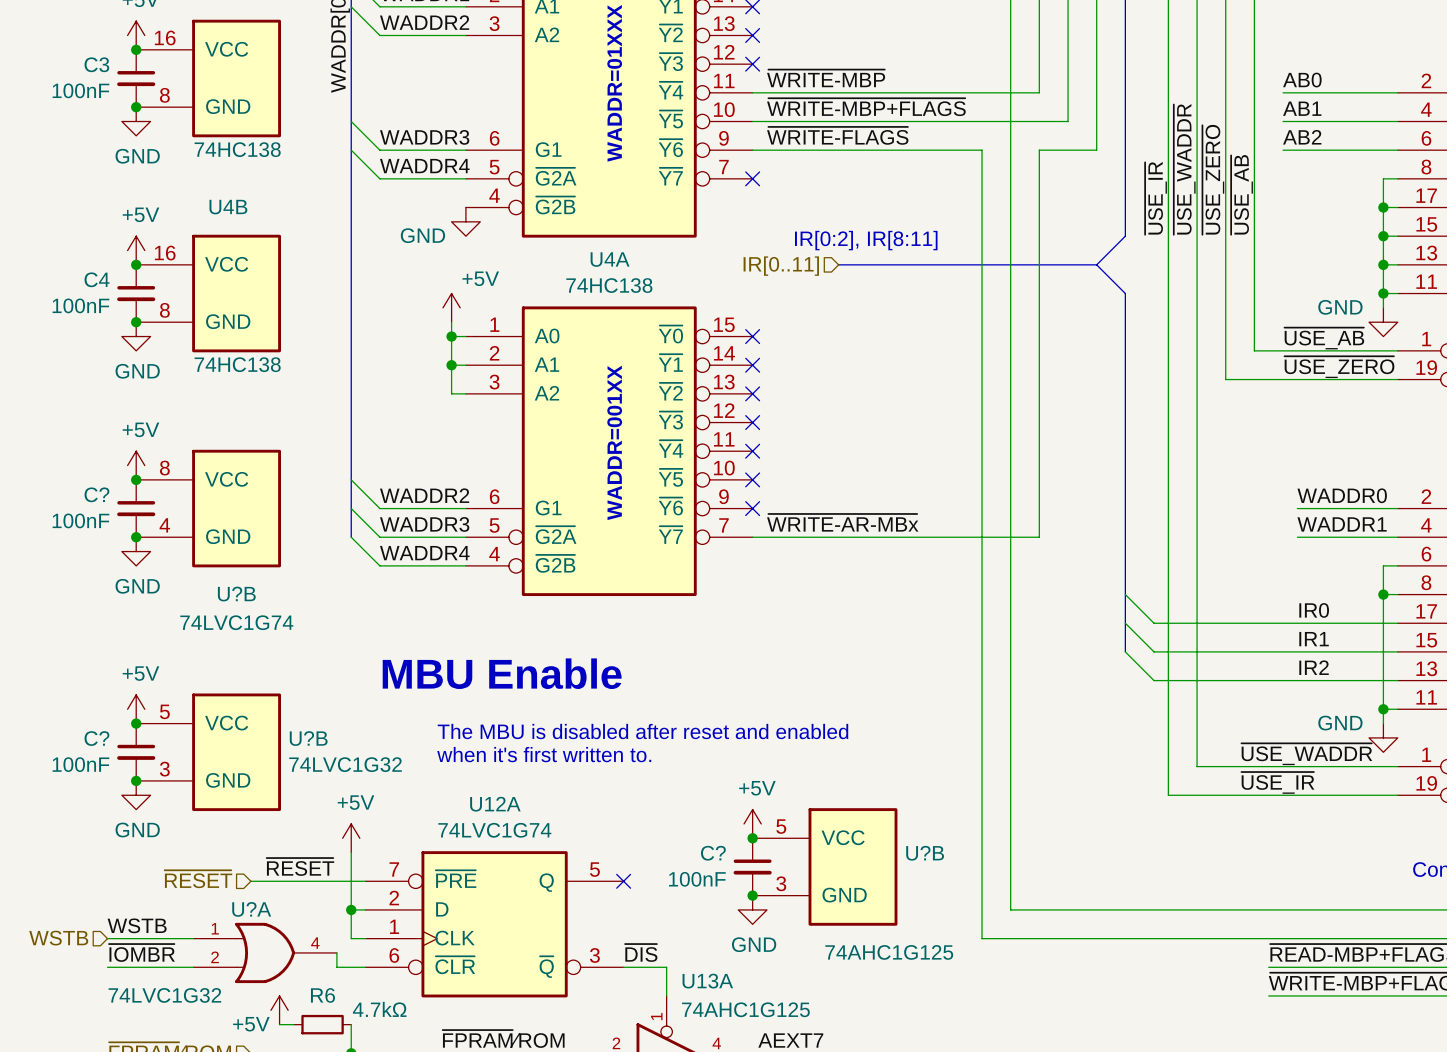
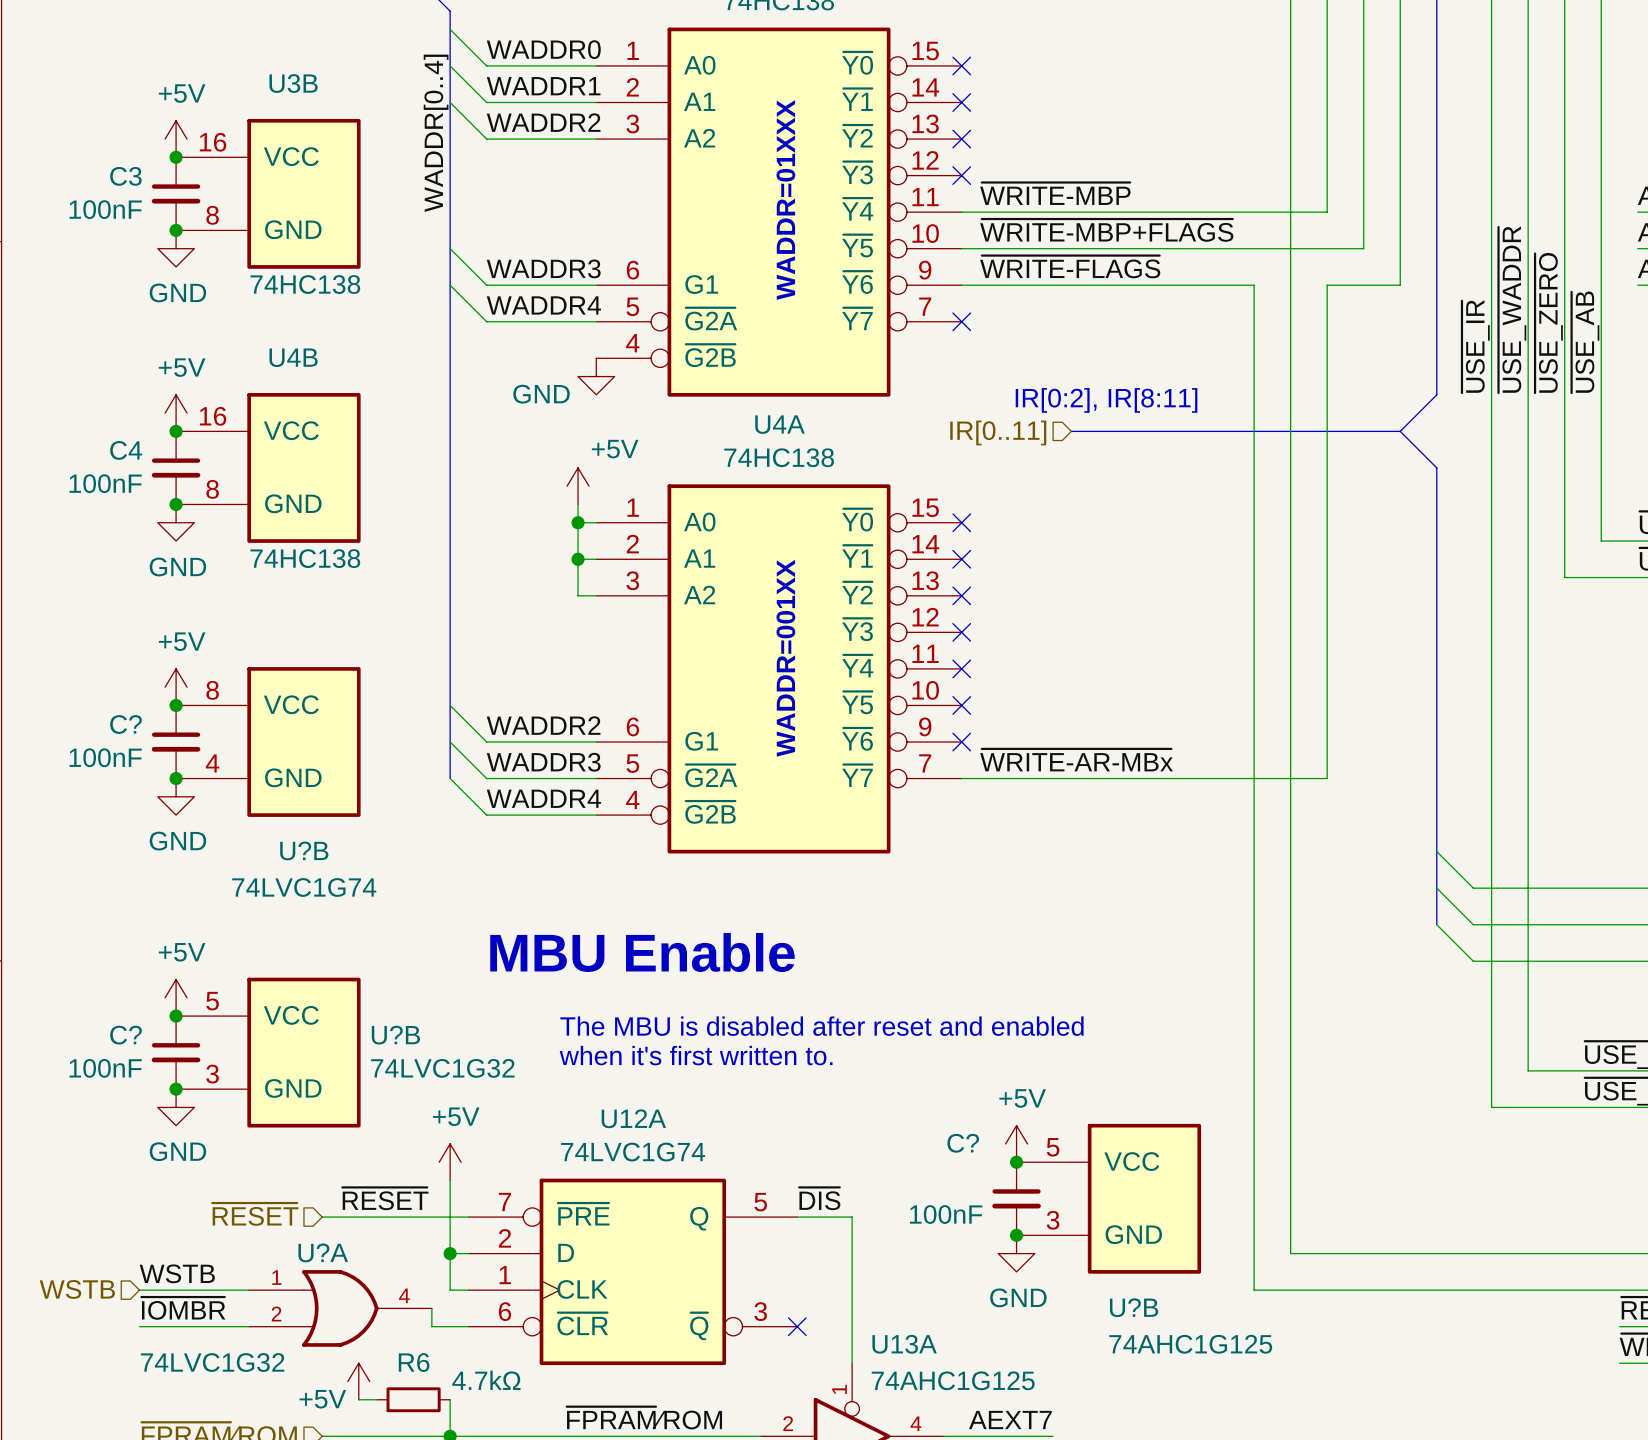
power symbol position: +5V (752, 823) -> +5V (1016, 1143)
junction: (752, 838) -> none
junction: none -> (1016, 1162)
C? name position: C? (713, 853) -> C? (963, 1143)
U?B name position: U?B (925, 853) -> U?B (1134, 1307)
C? position: (752, 866) -> (1016, 1198)
U?B position: (825, 866) -> (1108, 1198)
no-connect mark: (623, 881) -> none
junction: (752, 895) -> none
junction: none -> (1016, 1235)
power symbol position: GND (752, 909) -> GND (1016, 1253)
label position: ~{DIS} (641, 952) -> ~{DIS} (819, 1198)
U?B value position: 74AHC1G125 (889, 952) -> 74AHC1G125 (1190, 1344)
wire: (623, 967) (666, 967) -> (797, 1217) (852, 1217) (852, 1326)
no-connect mark: none -> (797, 1326)

